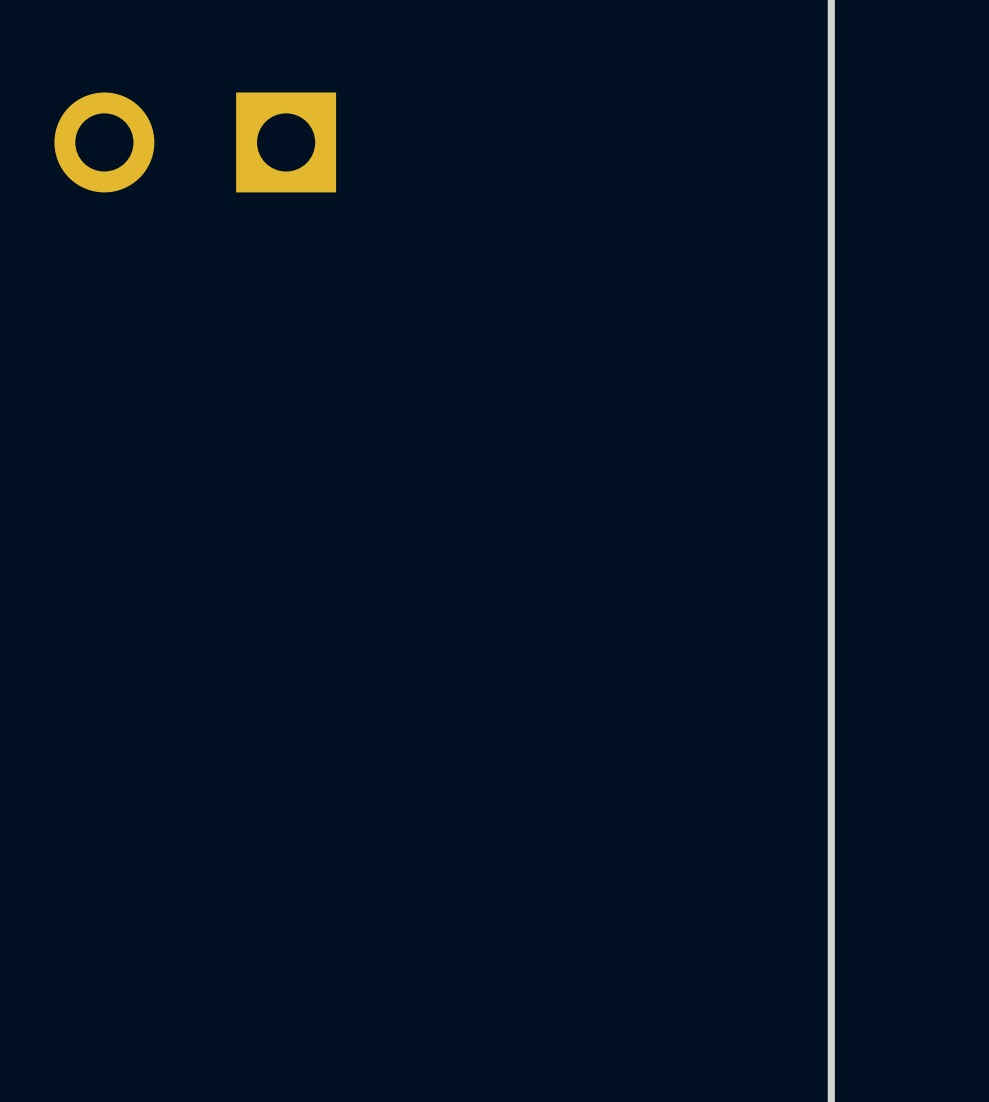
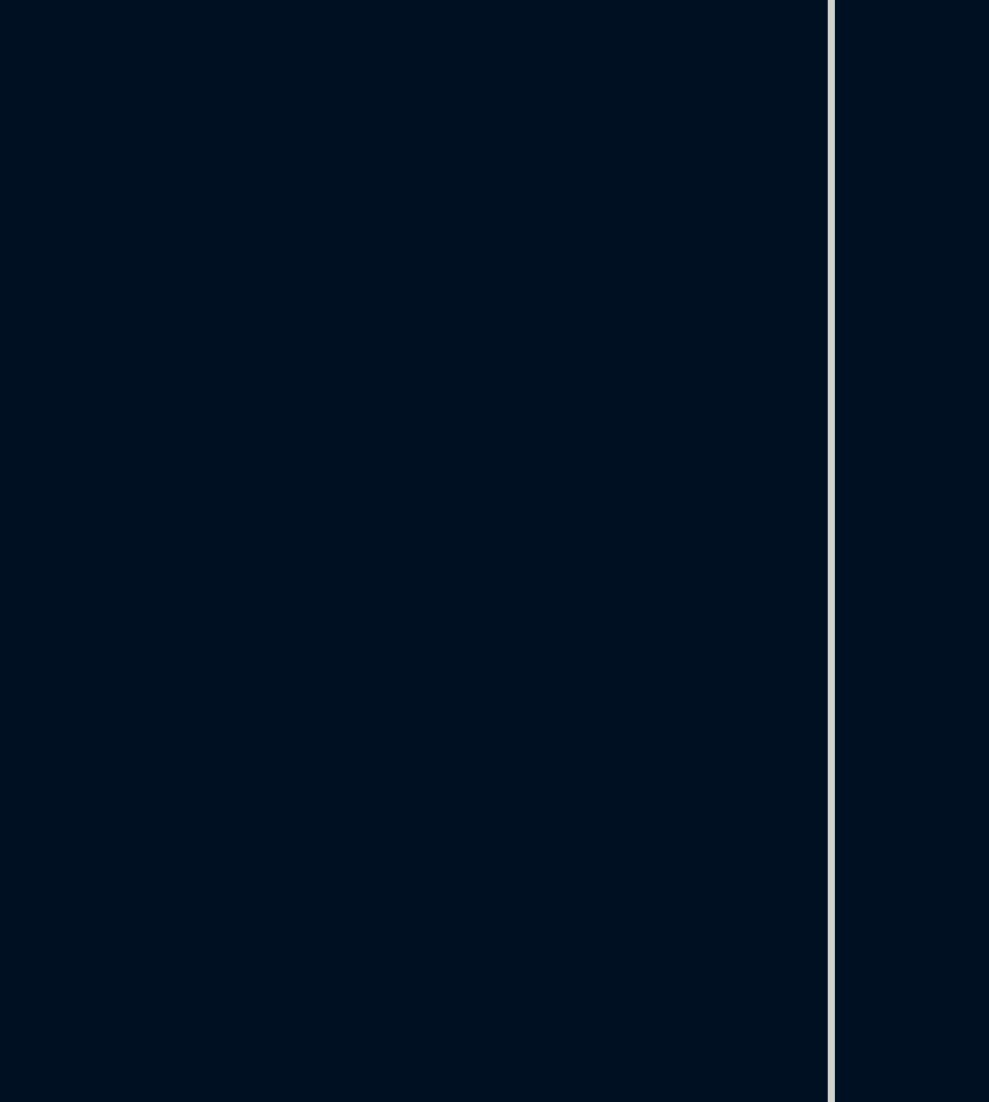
part: (195, 142) -> none

